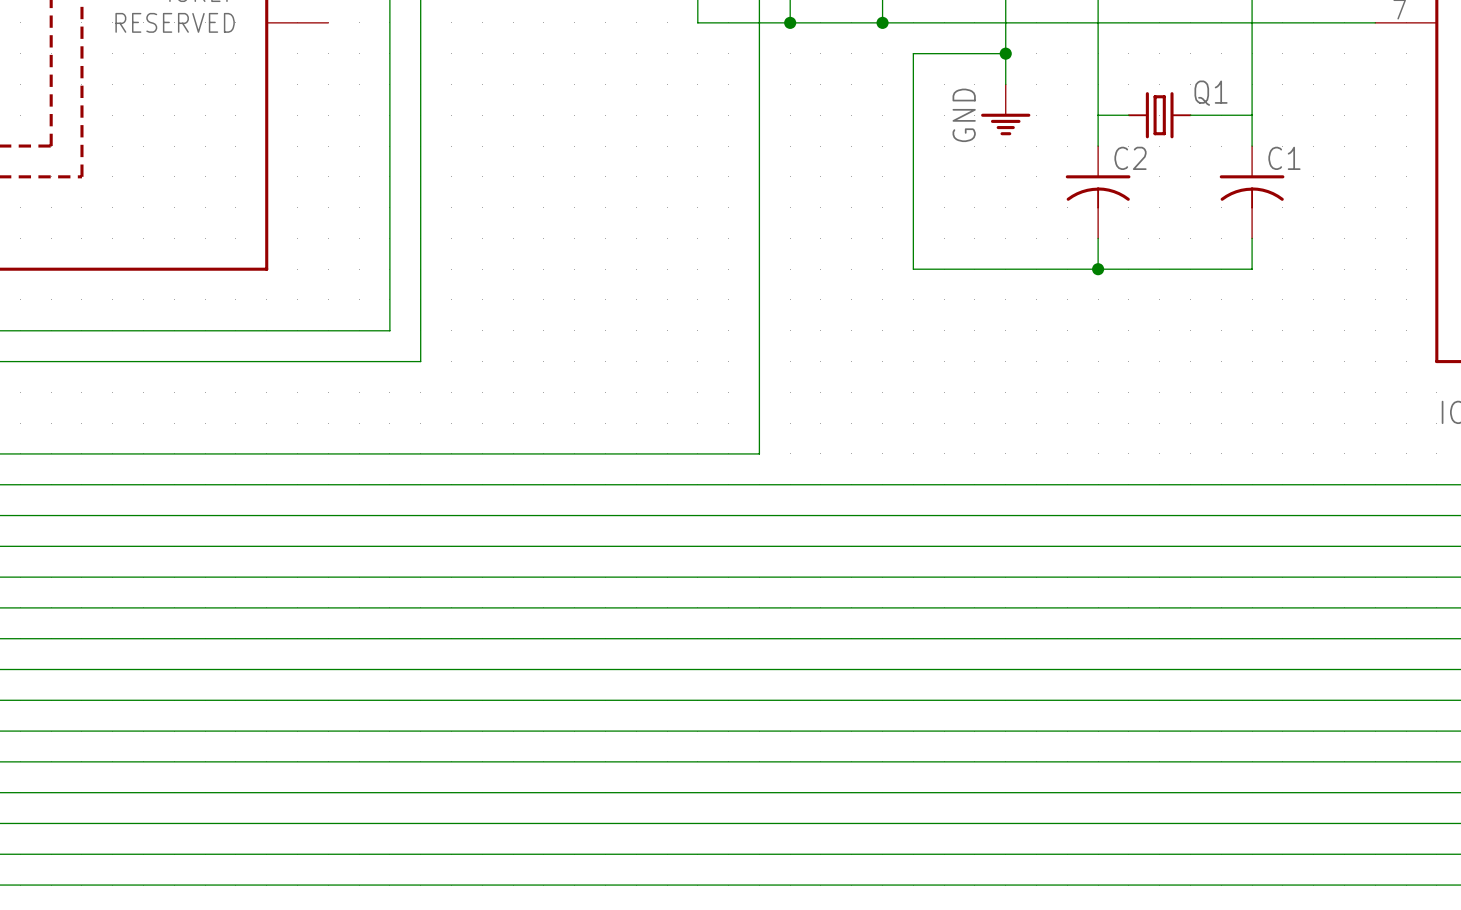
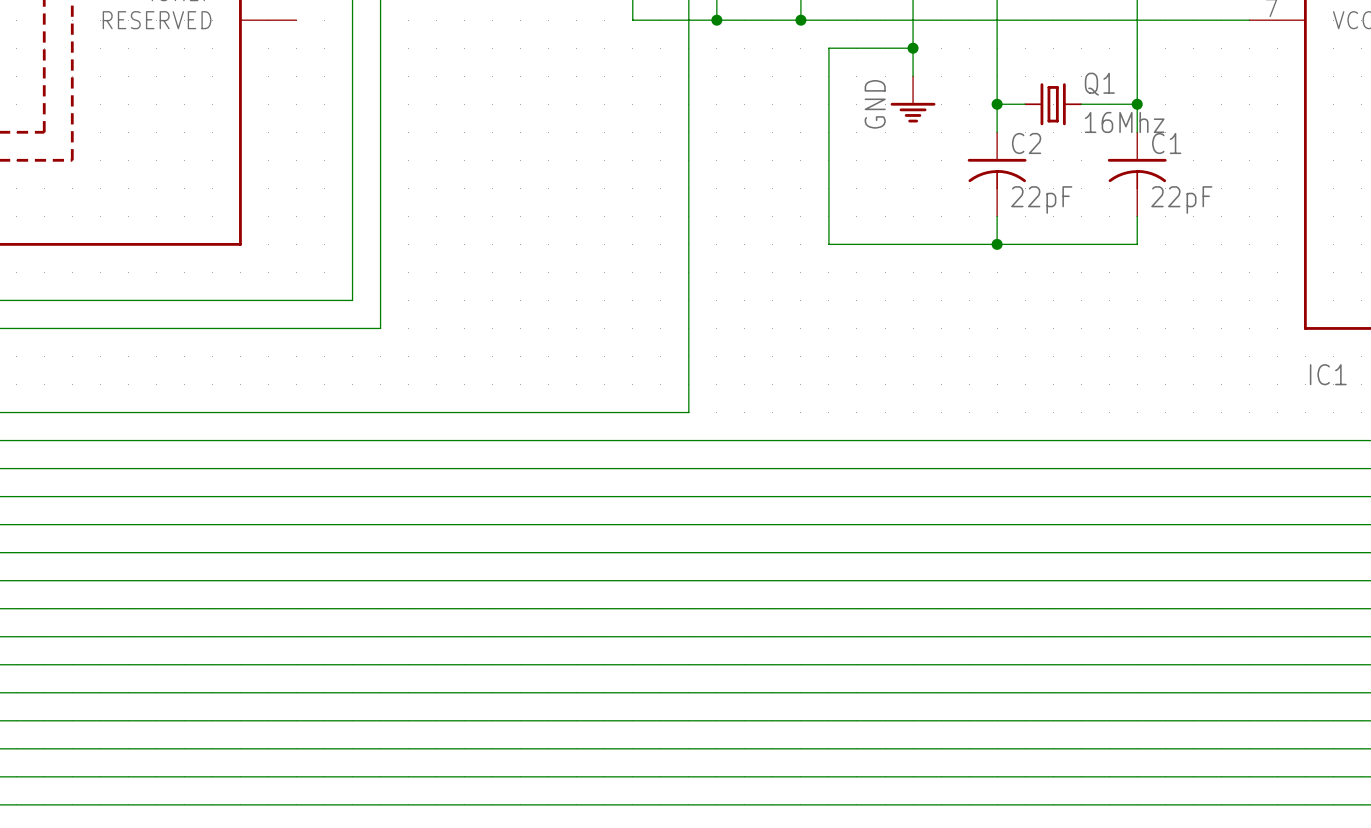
junction: none -> (997, 104)
junction: none -> (1137, 104)
Q1 value: none -> 16Mhz (1124, 122)
C2 value: none -> 22pF (1041, 200)
C1 value: none -> 22pF (1181, 200)

